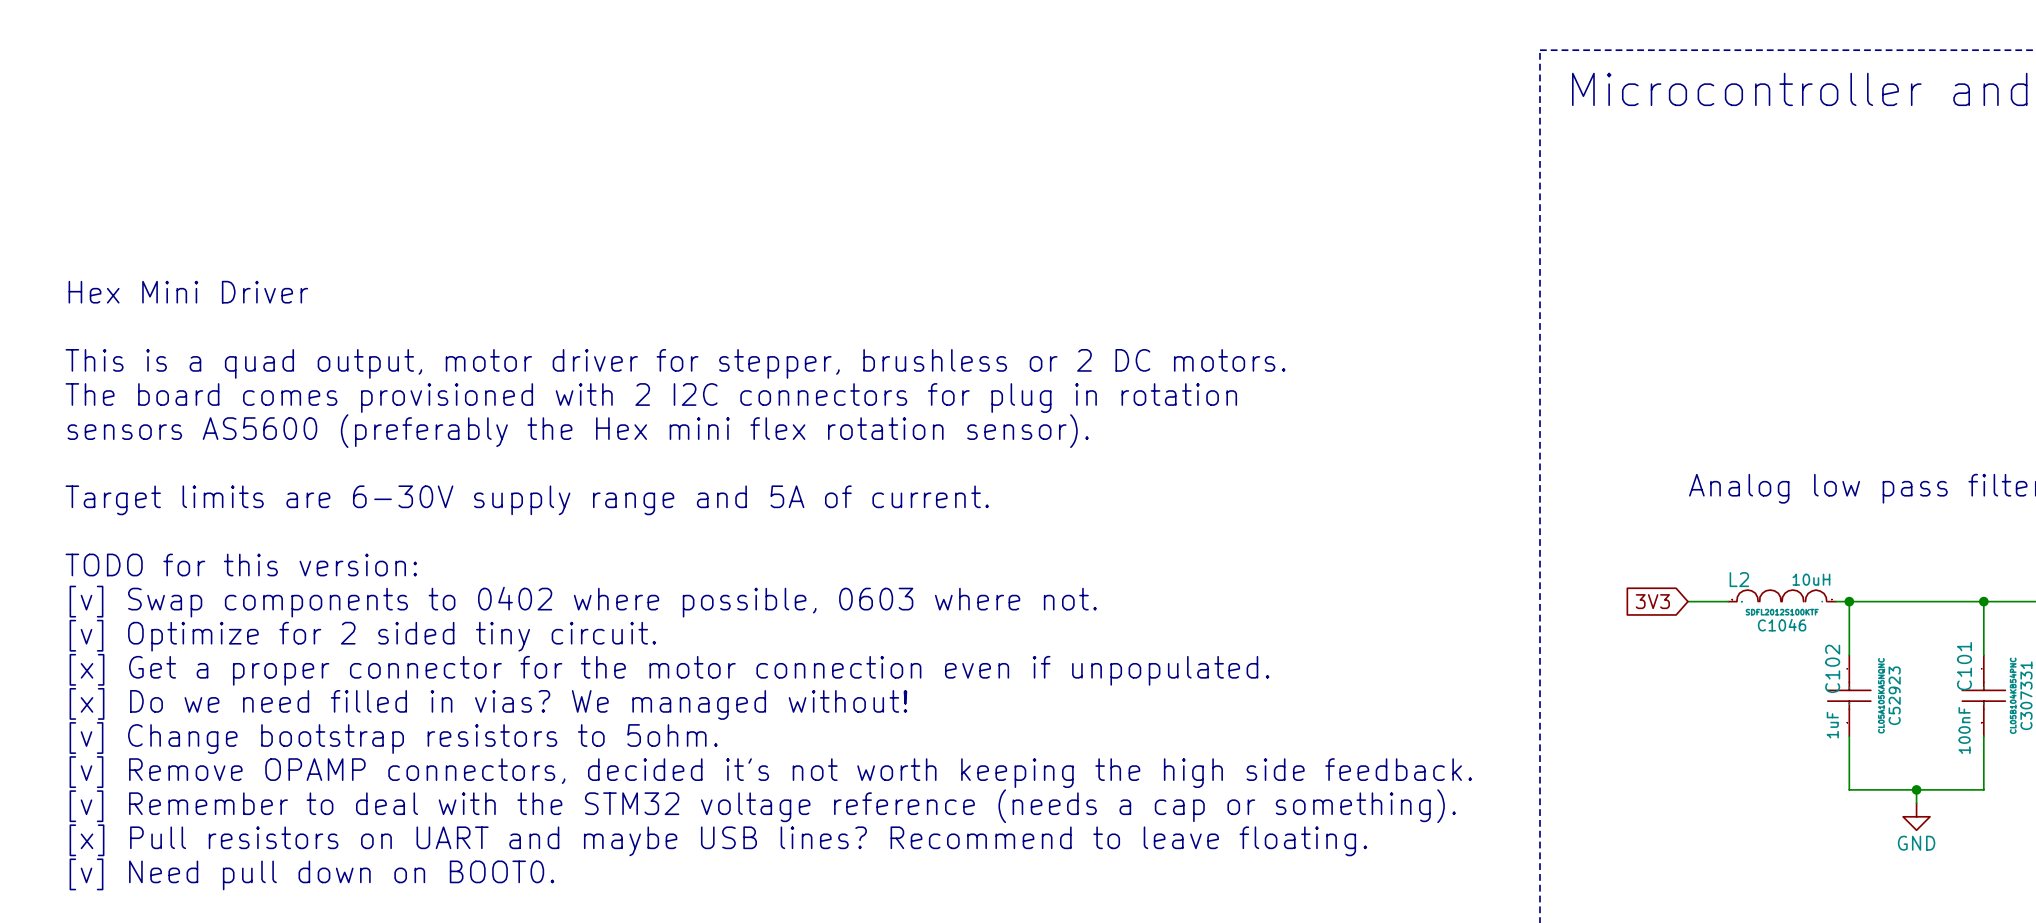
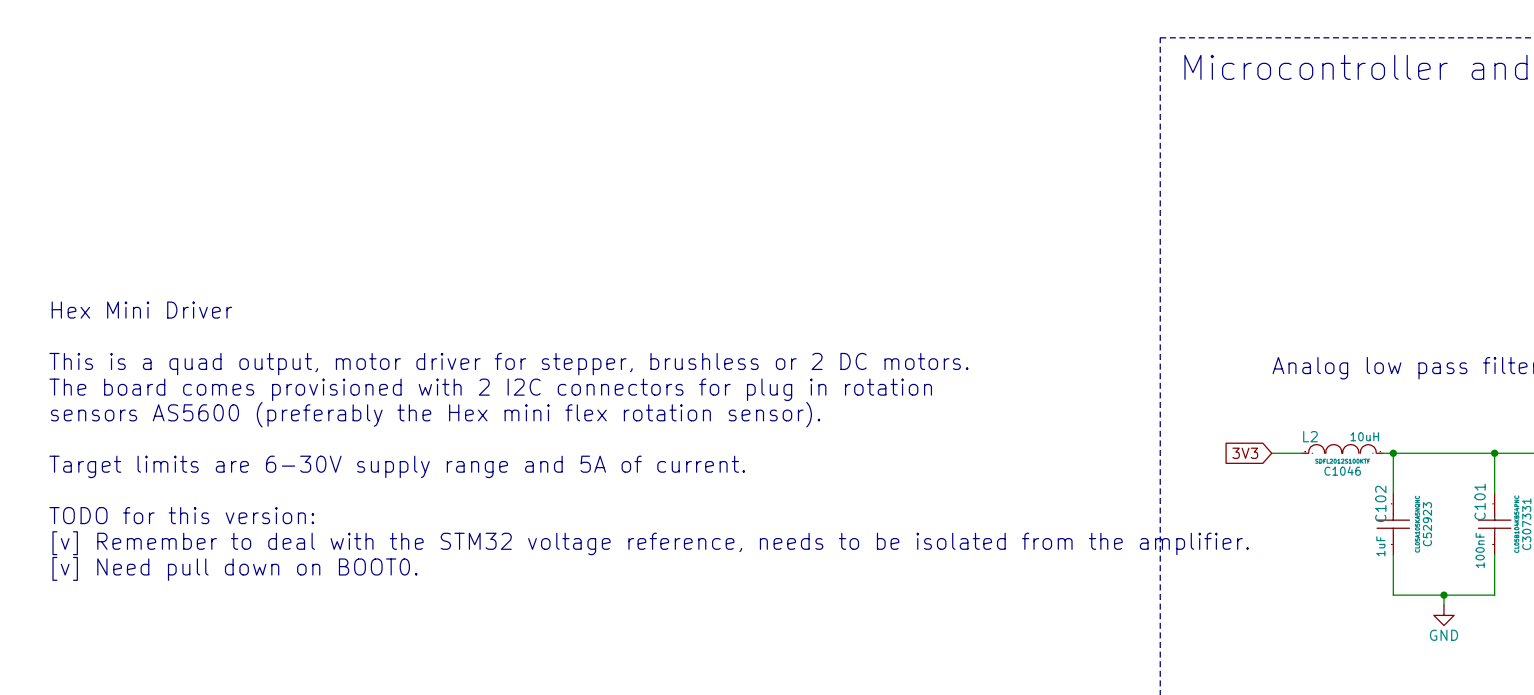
text position: Hex Mini Driver (188, 292) -> Hex Mini Driver (141, 310)
text position: This is a quad output, motor driver for stepper, brushless or 2 DC motors. (675, 363) -> This is a quad output, motor driver for stepper, brushless or 2 DC motors. (508, 364)
text position: The board comes provisioned with 2 I2C connectors for plug in rotation (651, 398) -> The board comes provisioned with 2 I2C connectors for plug in rotation (490, 389)
text position: sensors AS5600 (preferably the Hex mini flex rotation sensor). (578, 431) -> sensors AS5600 (preferably the Hex mini flex rotation sensor). (435, 414)
text position: Target limits are 6-30V supply range and 5A of current. (527, 500) -> Target limits are 6-30V supply range and 5A of current. (397, 466)
text position: TODO for this version: (241, 564) -> TODO for this version: (181, 515)
text: [v] Swap components to 0402 where possible, 0603 where not. (583, 601) -> none
text: [v] Optimize for 2 sided tiny circuit. (362, 635) -> none
text: [x] Get a proper connector for the motor connection even if unpopulated. (669, 669) -> none
text: [x] Do we need filled in vias? We managed without! (488, 703) -> none
text: none -> [v] Remember to deal with the STM32 voltage reference, needs to be isolated from the amplifier. (650, 543)
text: [v] Change bootstrap resistors to 5ohm. (393, 738) -> none
text: [v] Remove OPAMP connectors, decided it's not worth keeping the high side feedback. (770, 772) -> none
text: [v] Remember to deal with the STM32 voltage reference (needs a cap or something). (762, 806) -> none
text: [x] Pull resistors on UART and maybe USB lines? Recommend to leave floating. (718, 840) -> none
text position: [v] Need pull down on BOOT0. (311, 874) -> [v] Need pull down on BOOT0. (235, 568)

